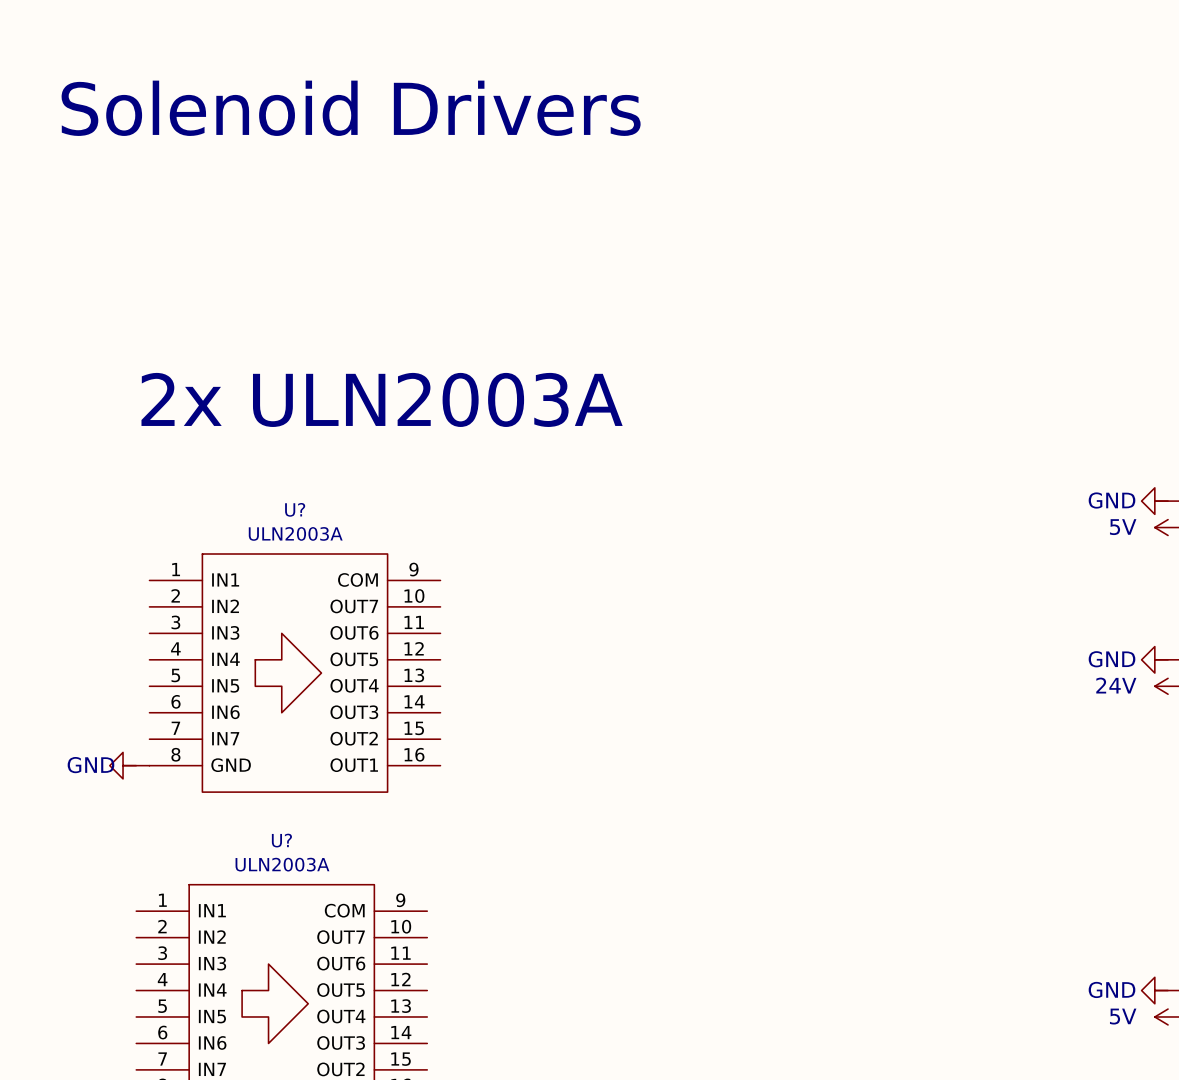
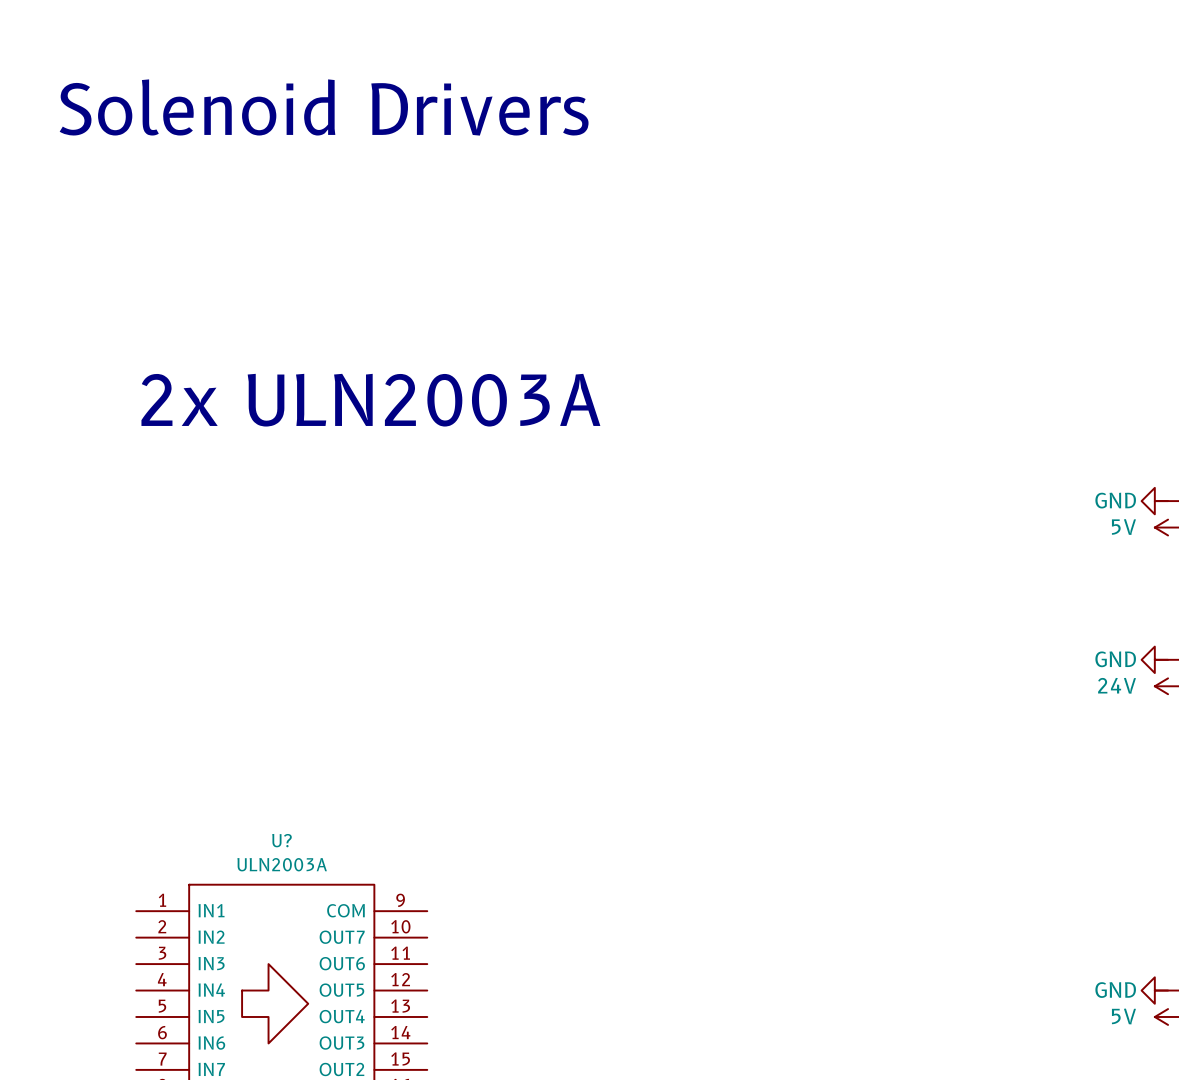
U?: ULN2003A (294, 673) -> none
power symbol: GND (129, 765) -> none

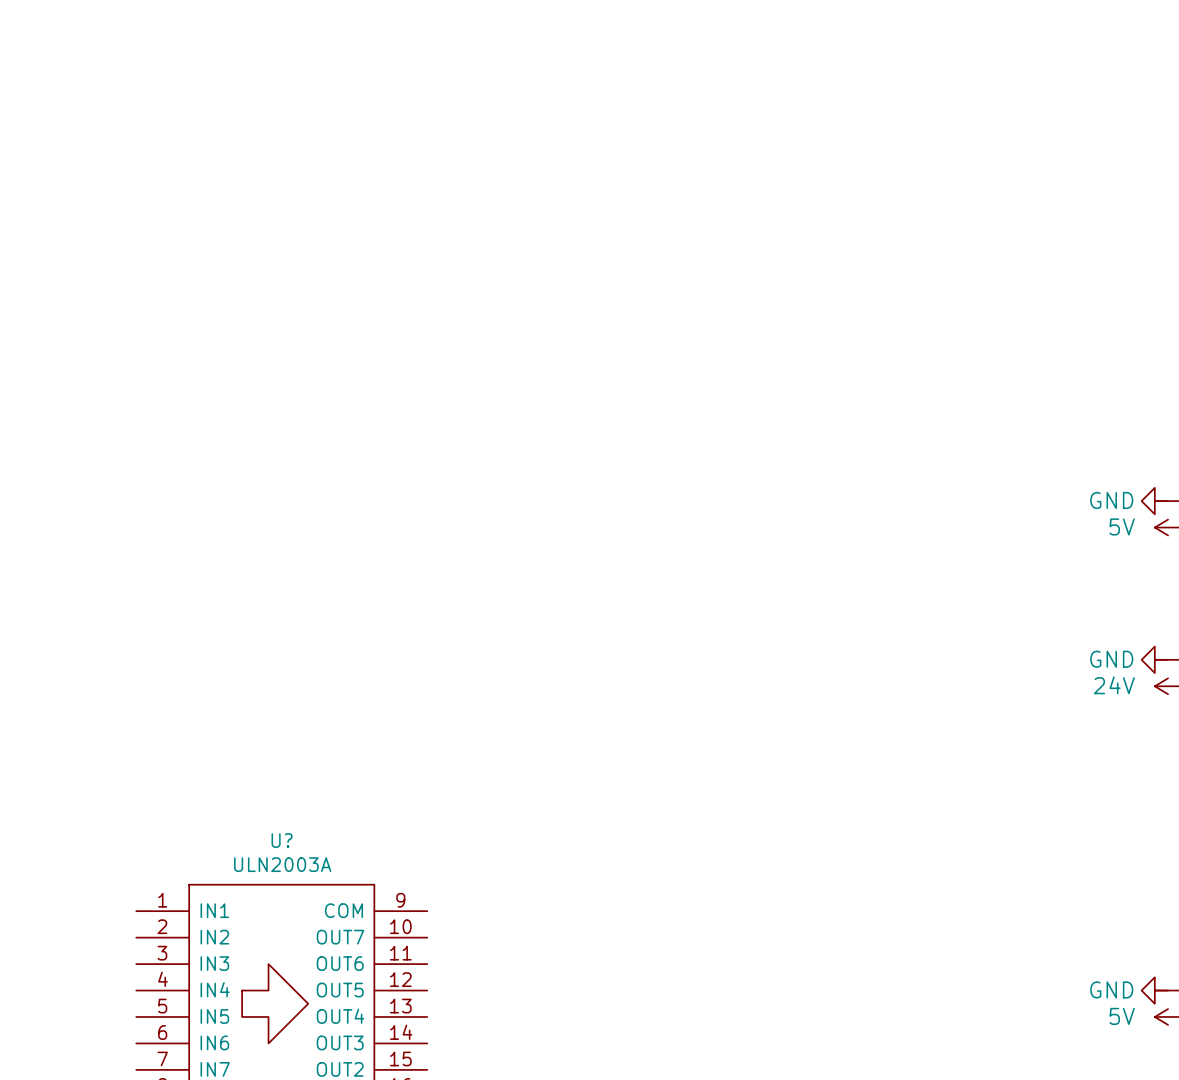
text: Solenoid Drivers (324, 107) -> none
text: 2x ULN2003A (370, 400) -> none

